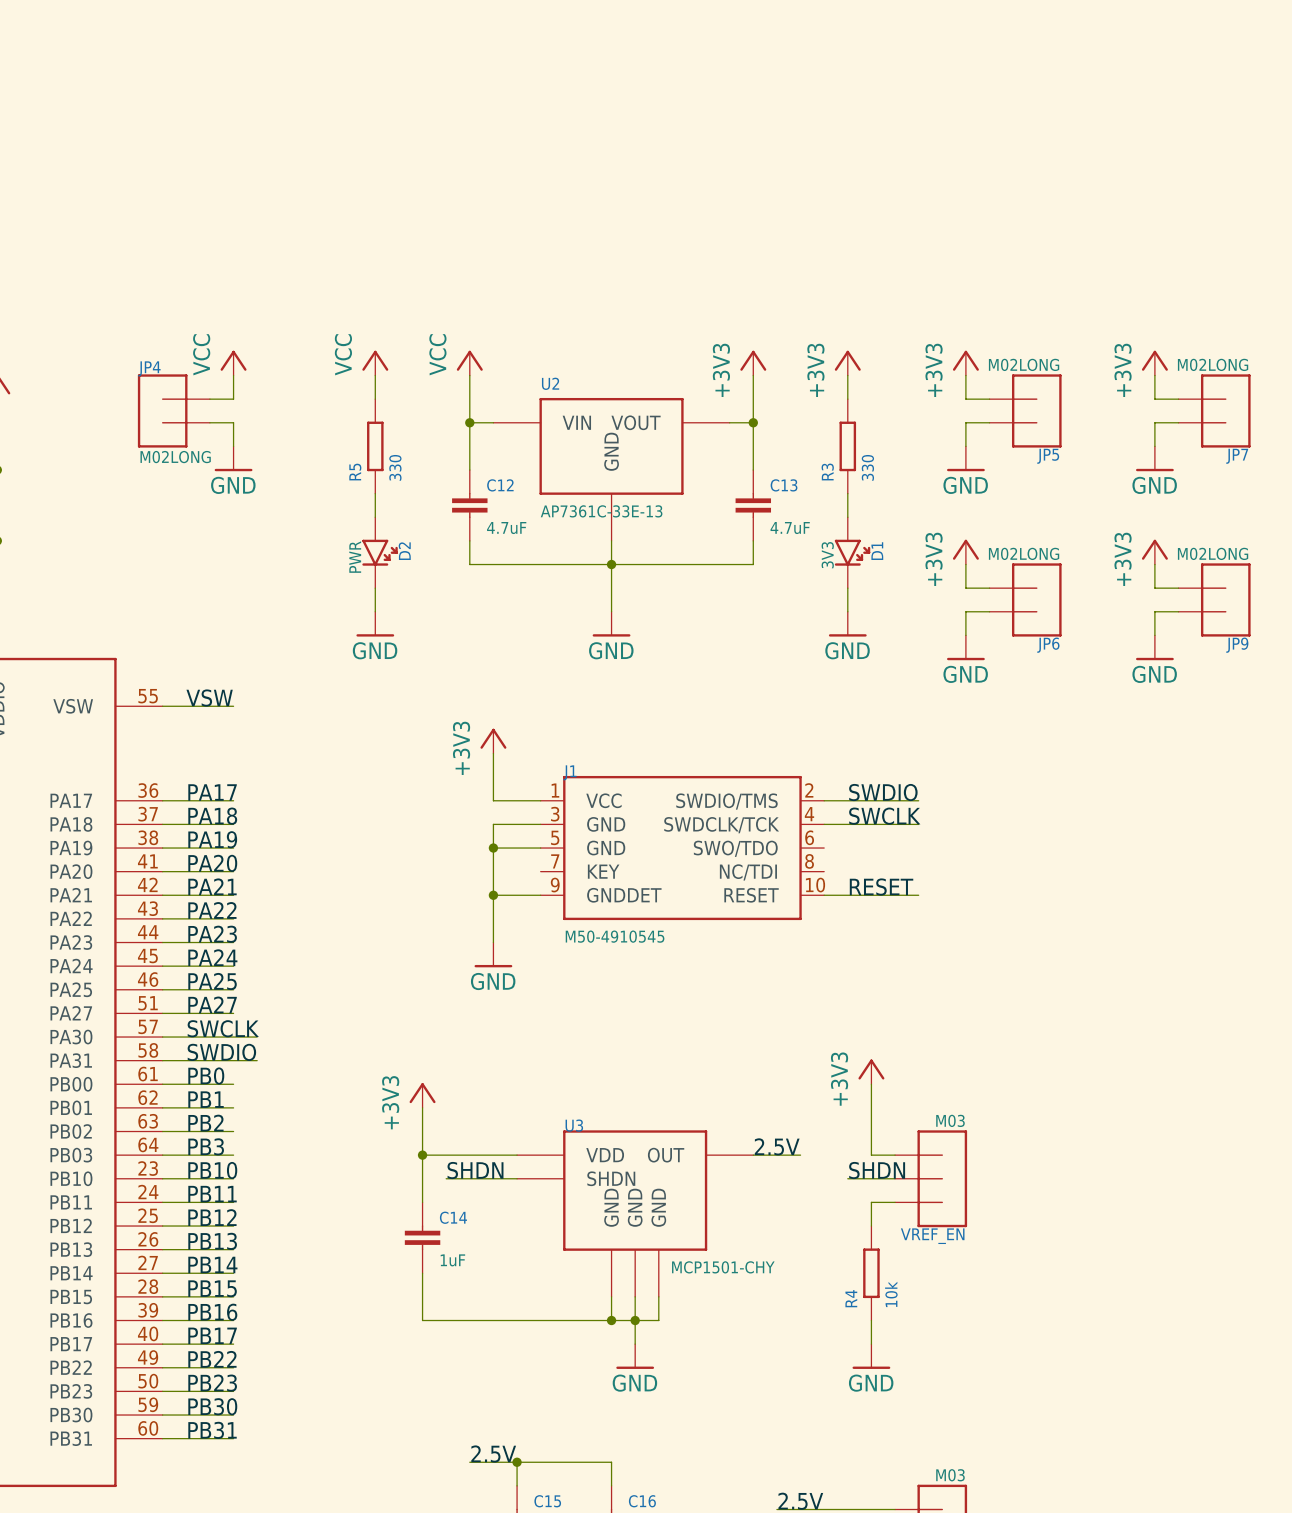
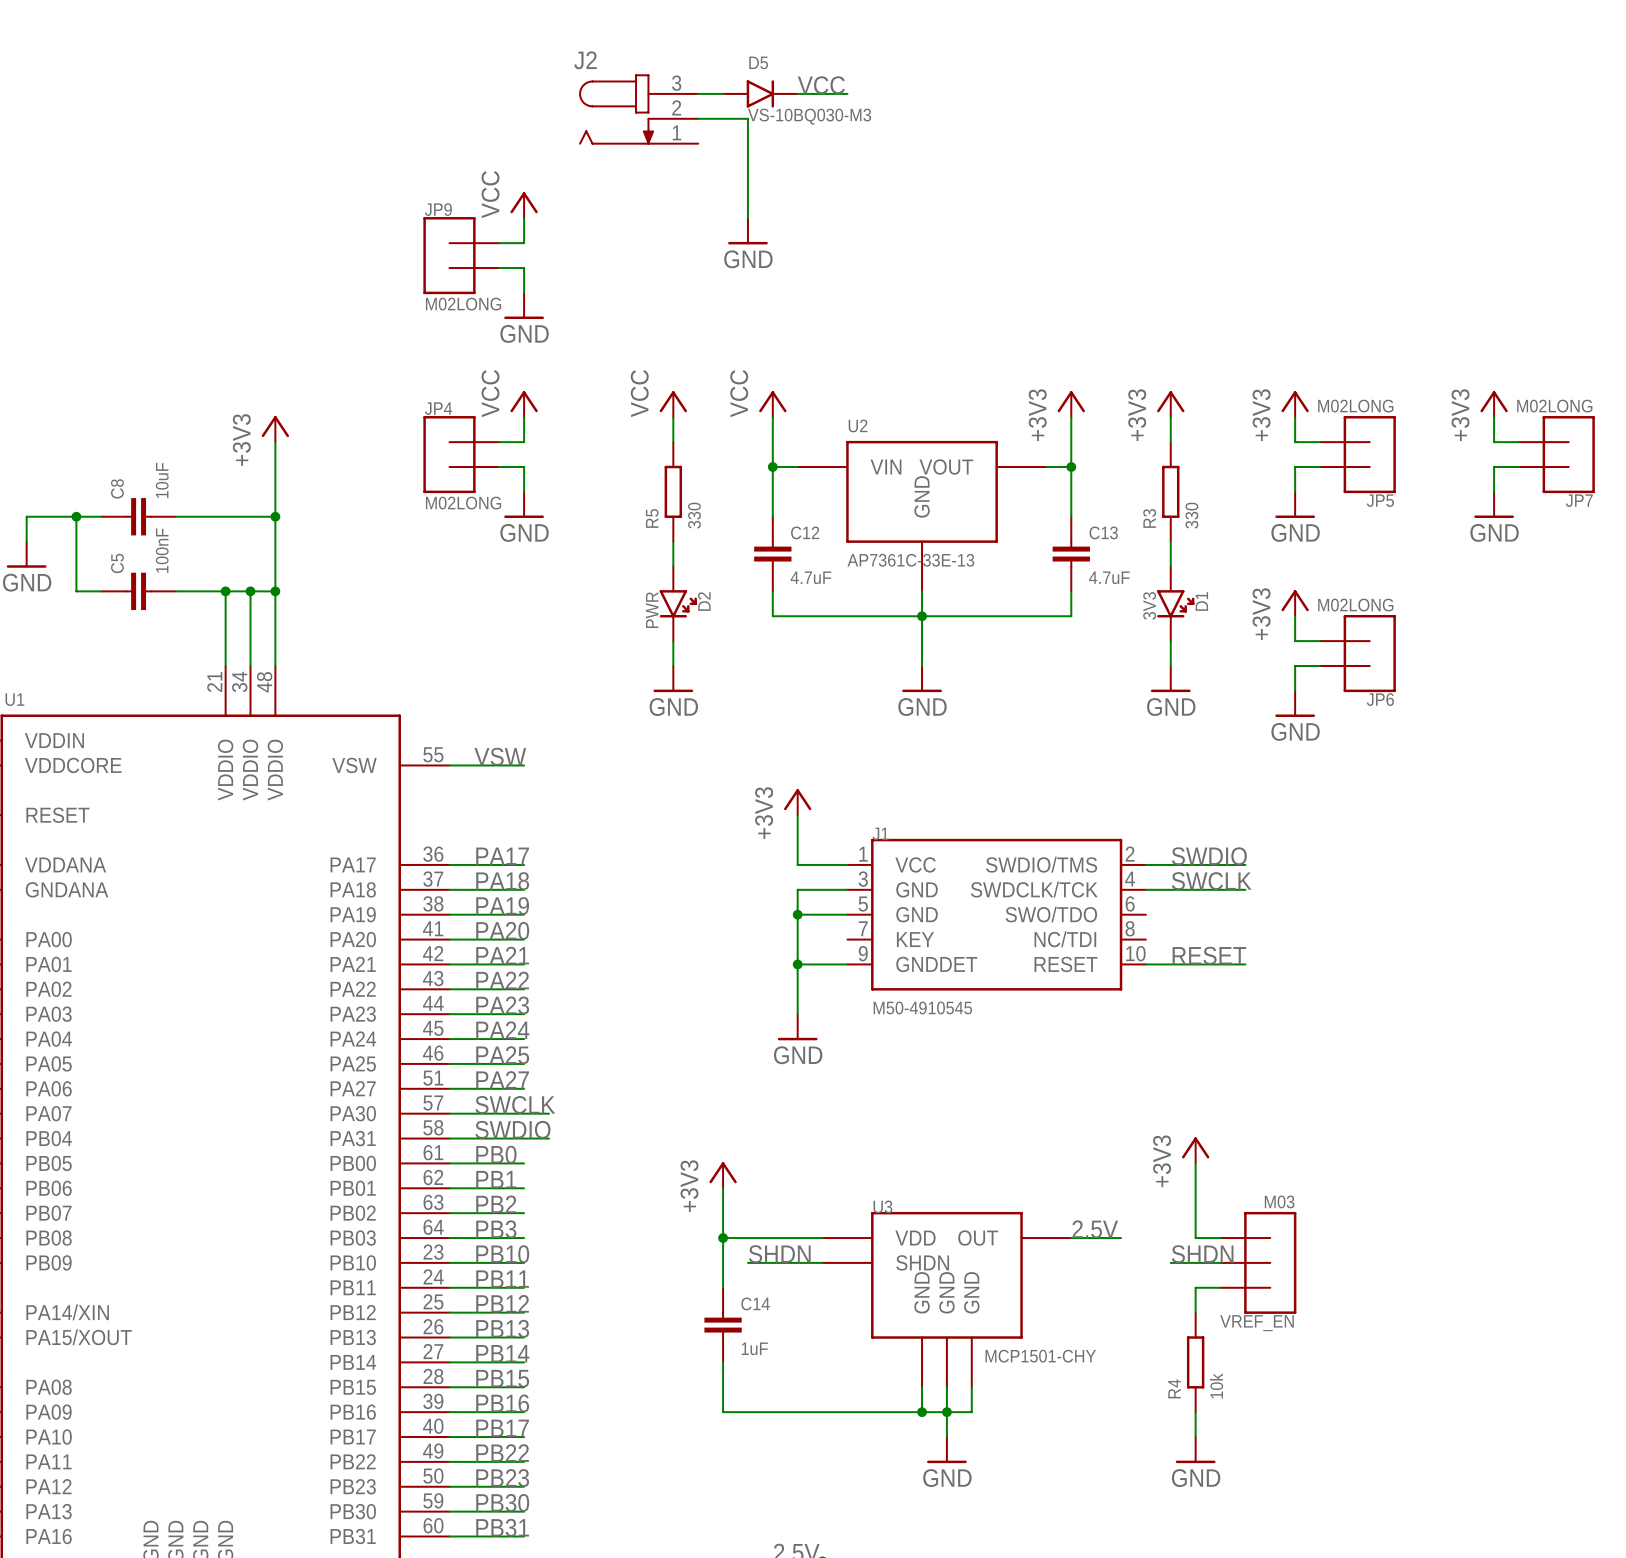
label: none -> VCC (821, 85)
wire: none -> (698, 93) (723, 93)
D5: none -> VS-10BQ030-M3 (760, 93)
wire: none -> (797, 93) (847, 93)
J2: none -> (638, 109)
wire: none -> (698, 118) (747, 118) (747, 218)
power symbol: none -> VCC (524, 205)
wire: none -> (524, 218) (524, 243) (499, 243)
power symbol: none -> GND (747, 231)
wire: none -> (499, 268) (524, 268) (524, 292)
power symbol: none -> GND (524, 305)
power symbol: +3V3 (1154, 552) -> none
wire: (1154, 564) (1154, 588) (1178, 588) -> none
JP9 position: (1214, 599) -> (461, 255)
JP9 rotation: 0° (1225, 599) -> 180° (449, 255)
wire: (1178, 611) (1154, 611) (1154, 635) -> none
power symbol: GND (1154, 647) -> none

